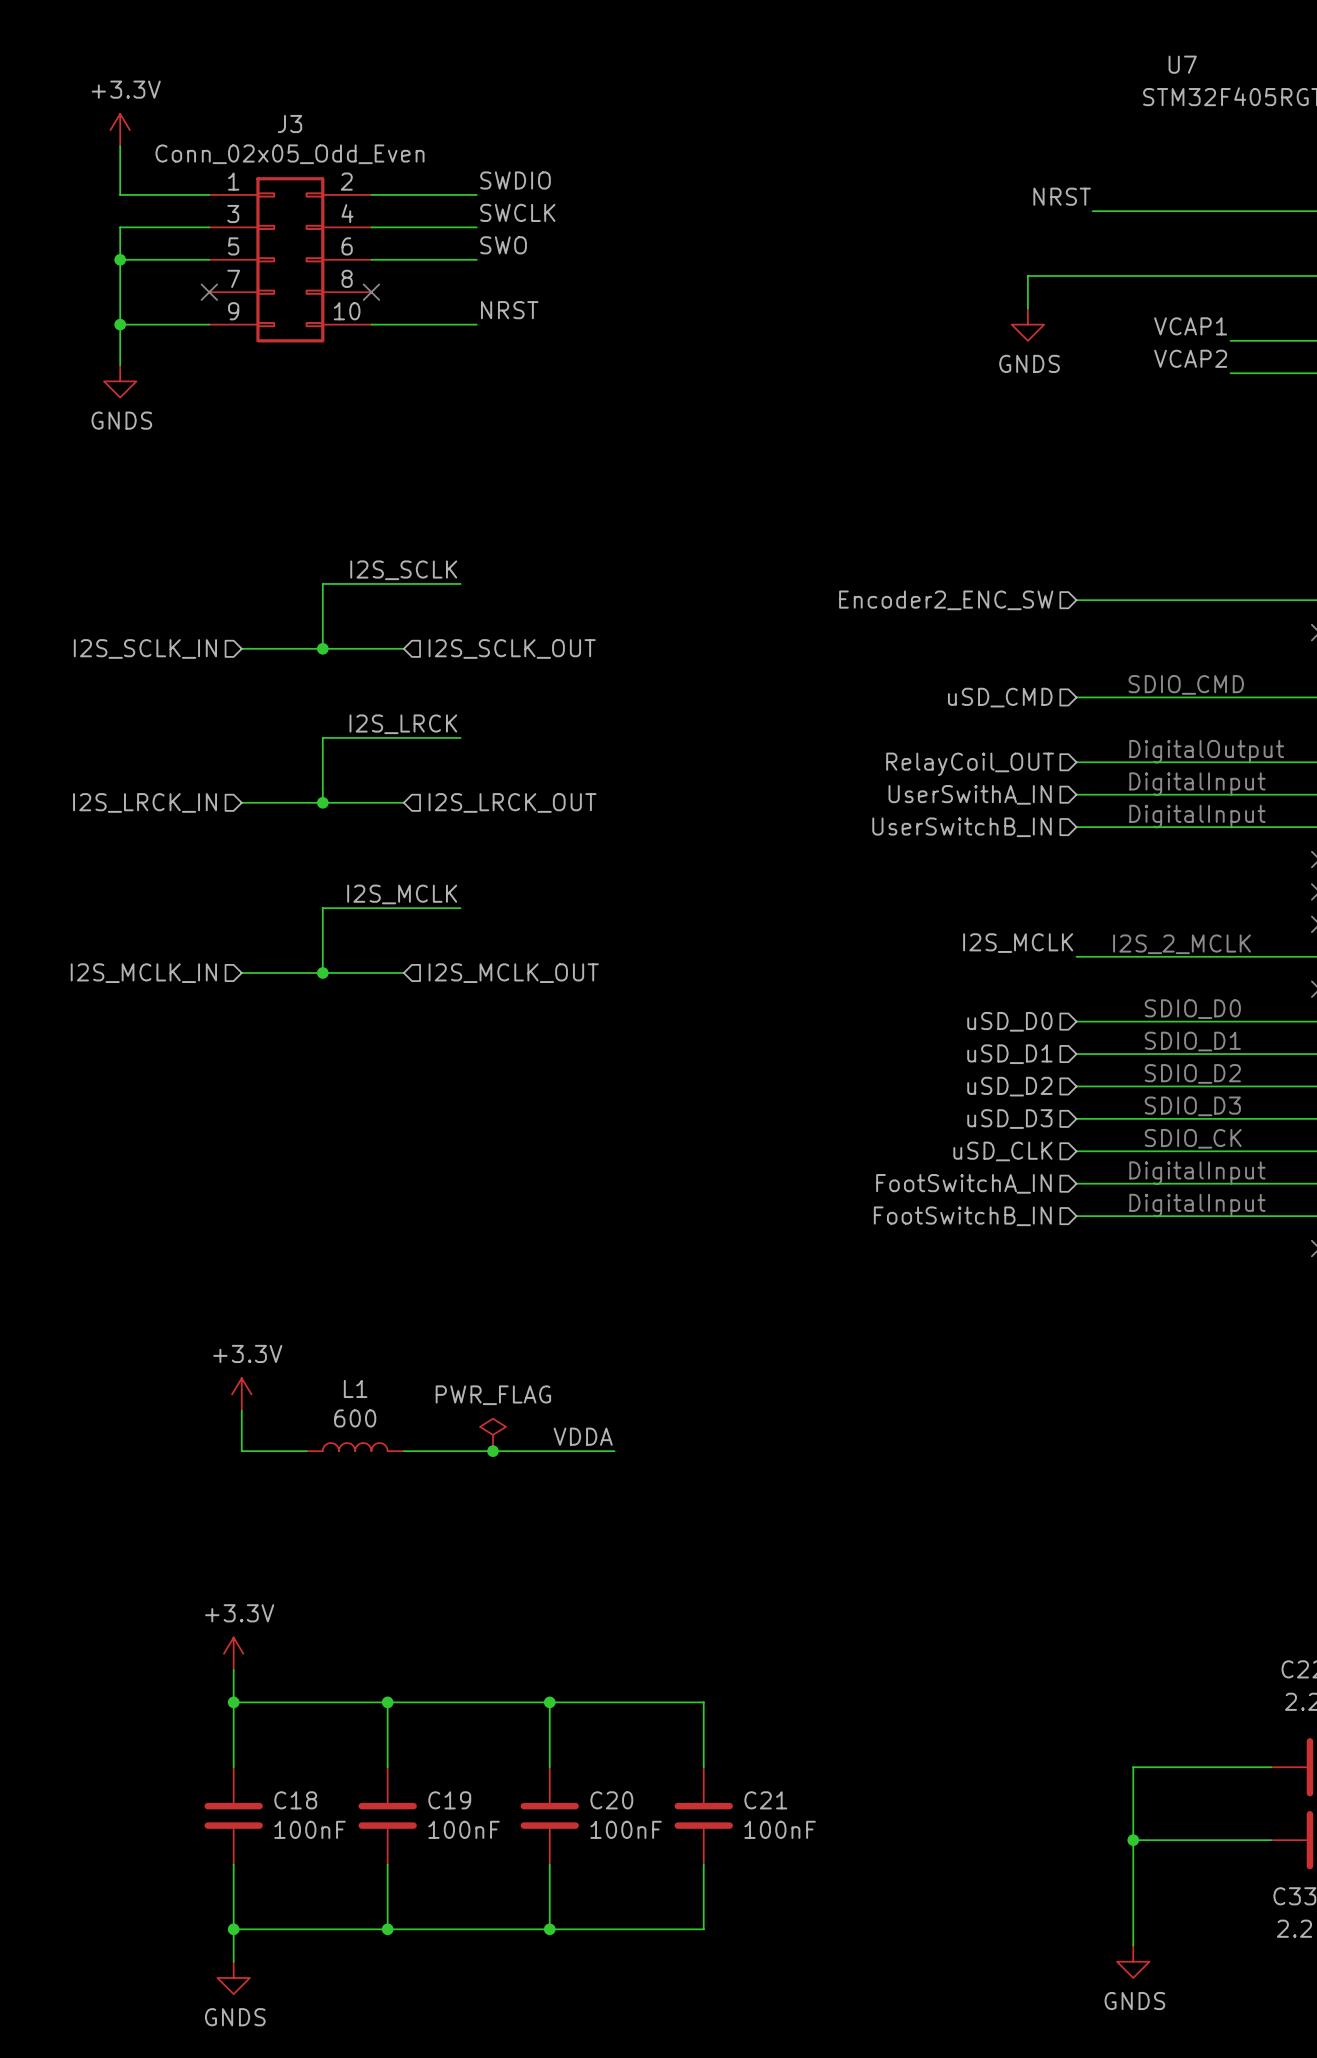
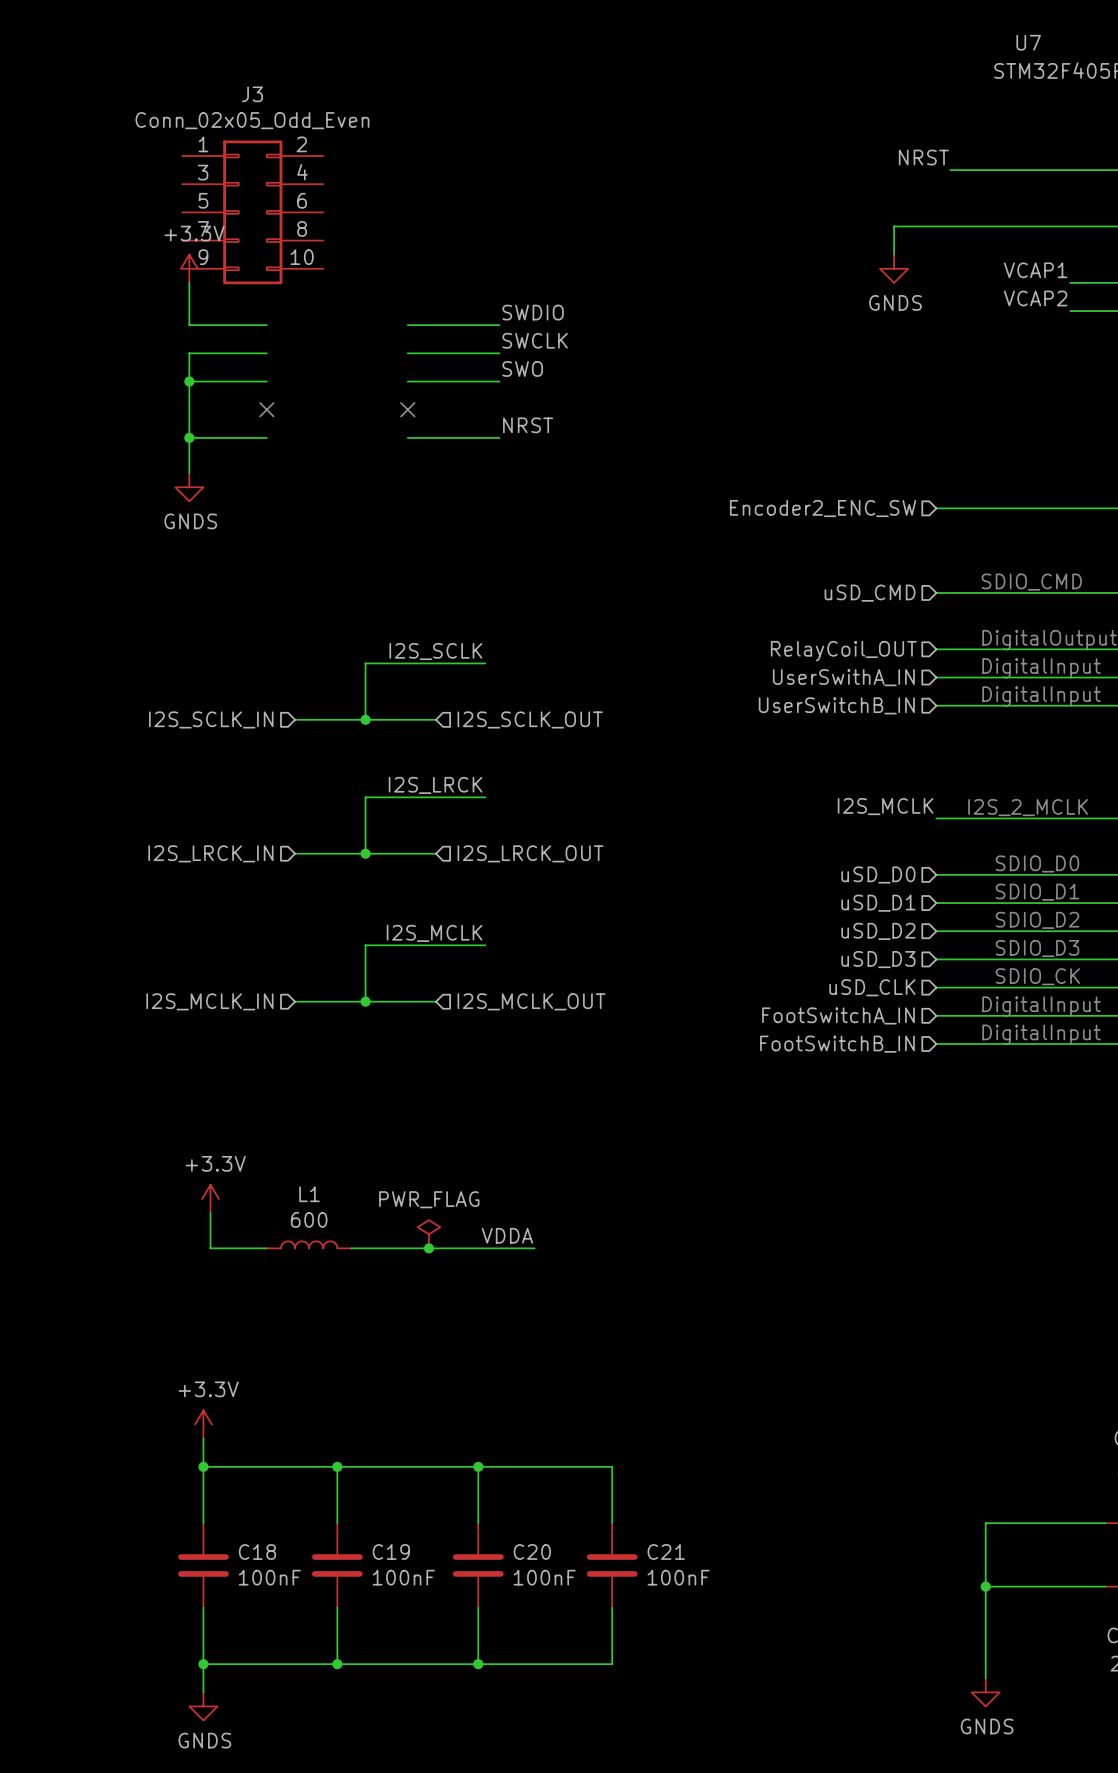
power symbol position: +3.3V (120, 130) -> +3.3V (189, 268)
wire: (120, 146) (120, 194) (209, 194) -> (189, 282) (189, 325) (266, 325)
label position: SWDIO (515, 180) -> SWDIO (533, 312)
wire: (371, 194) (476, 194) -> (407, 325) (499, 325)
label position: SWCLK (517, 212) -> SWCLK (535, 340)
wire: (209, 227) (120, 227) (120, 365) -> (266, 353) (189, 353) (189, 473)
wire: (371, 227) (476, 227) -> (407, 353) (499, 353)
label position: SWO (503, 245) -> SWO (522, 368)
wire: (120, 259) (209, 259) -> (189, 381) (266, 381)
junction: (120, 259) -> none
wire: (371, 259) (476, 259) -> (407, 381) (499, 381)
no-connect mark: (209, 292) -> none
no-connect mark: (371, 292) -> none
label position: NRST (509, 310) -> NRST (528, 425)
wire: (120, 324) (209, 324) -> (189, 437) (266, 437)
junction: (120, 324) -> none
wire: (371, 324) (476, 324) -> (407, 437) (499, 437)
power symbol position: GNDS (120, 381) -> GNDS (189, 487)
junction: none -> (189, 381)
no-connect mark: none -> (266, 409)
no-connect mark: none -> (407, 409)
junction: none -> (189, 437)
label position: I2S_SCLK (403, 570) -> I2S_SCLK (435, 651)
wire: (460, 583) (322, 583) (322, 648) -> (485, 663) (365, 663) (365, 719)
hierarchical label position: I2S_SCLK_IN (145, 648) -> I2S_SCLK_IN (211, 719)
wire: (241, 648) (403, 648) -> (295, 719) (436, 719)
junction: (322, 648) -> none
hierarchical label position: I2S_SCLK_OUT (512, 648) -> I2S_SCLK_OUT (530, 719)
label position: I2S_LRCK (403, 724) -> I2S_LRCK (435, 785)
wire: (460, 737) (322, 737) (322, 802) -> (485, 797) (365, 797) (365, 853)
hierarchical label position: I2S_LRCK_IN (145, 802) -> I2S_LRCK_IN (210, 853)
wire: (241, 802) (403, 802) -> (295, 853) (436, 853)
junction: (322, 802) -> none
hierarchical label position: I2S_LRCK_OUT (512, 802) -> I2S_LRCK_OUT (530, 853)
junction: none -> (365, 719)
label position: I2S_MCLK (402, 894) -> I2S_MCLK (434, 933)
wire: (460, 908) (322, 908) (322, 972) -> (485, 945) (365, 945) (365, 1001)
wire: (241, 972) (403, 972) -> (295, 1001) (436, 1001)
junction: (322, 972) -> none
hierarchical label position: I2S_MCLK_IN (143, 973) -> I2S_MCLK_IN (209, 1001)
hierarchical label position: I2S_MCLK_OUT (513, 973) -> I2S_MCLK_OUT (531, 1001)
junction: none -> (365, 853)
junction: none -> (365, 1001)

